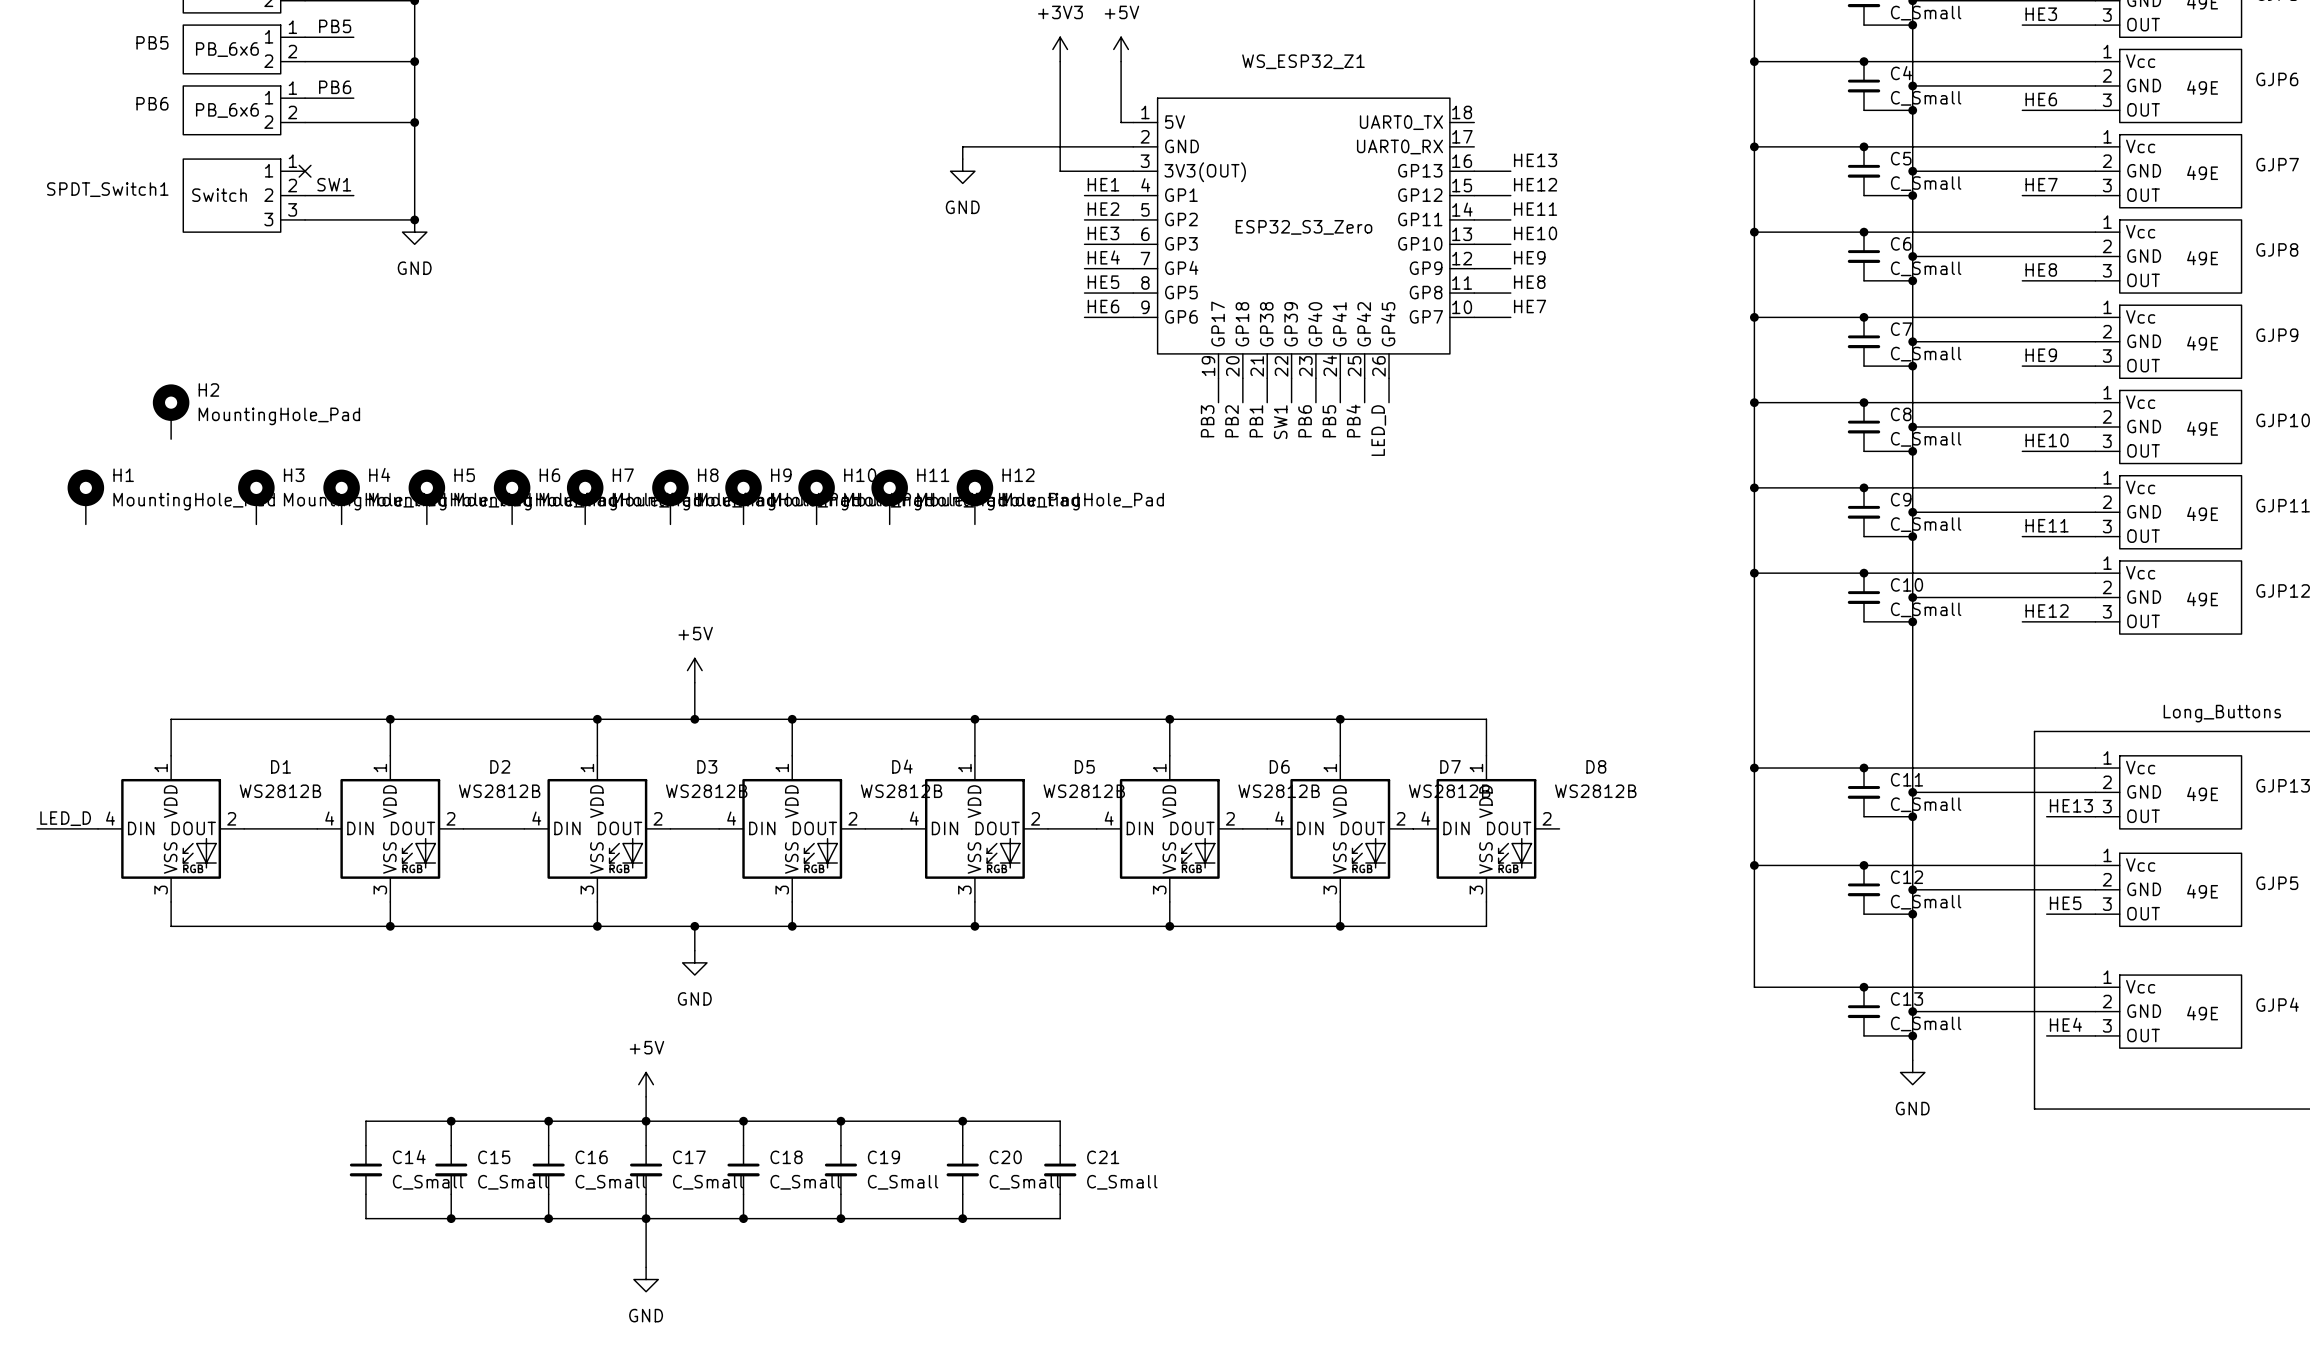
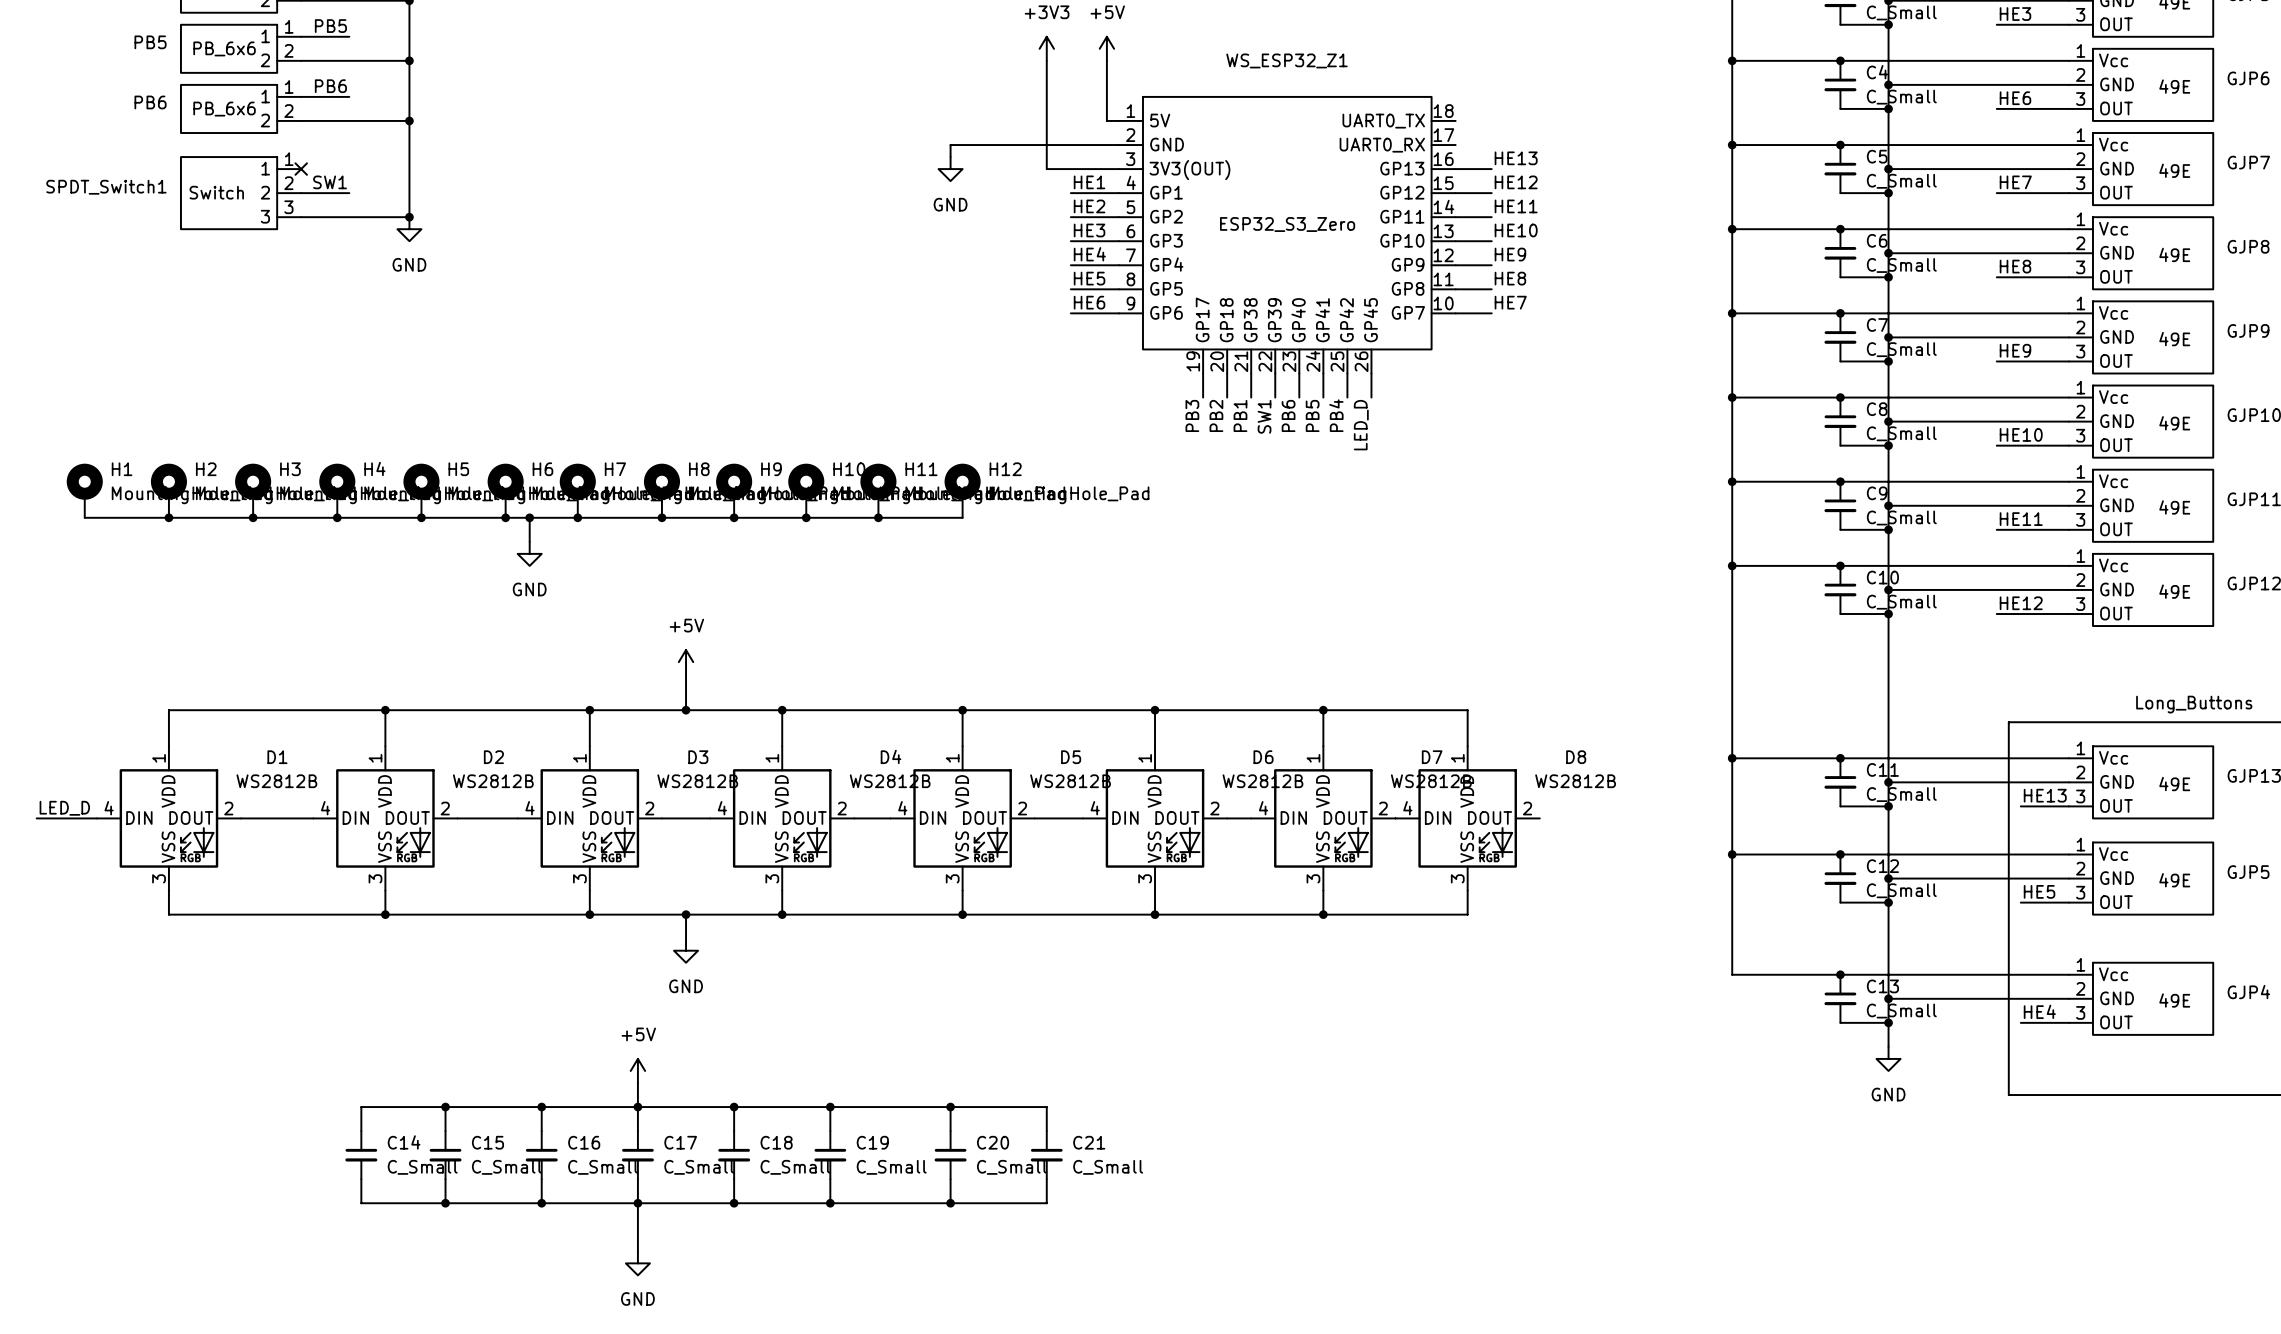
H2 position: (171, 411) -> (168, 490)
wire: none -> (84, 517) (962, 517)
junction: none -> (168, 517)
junction: none -> (253, 517)
junction: none -> (337, 517)
junction: none -> (421, 517)
junction: none -> (505, 517)
wire: none -> (529, 517) (529, 541)
junction: none -> (529, 517)
junction: none -> (577, 517)
junction: none -> (661, 517)
junction: none -> (734, 517)
junction: none -> (806, 517)
junction: none -> (878, 517)
power symbol: none -> GND (529, 553)

